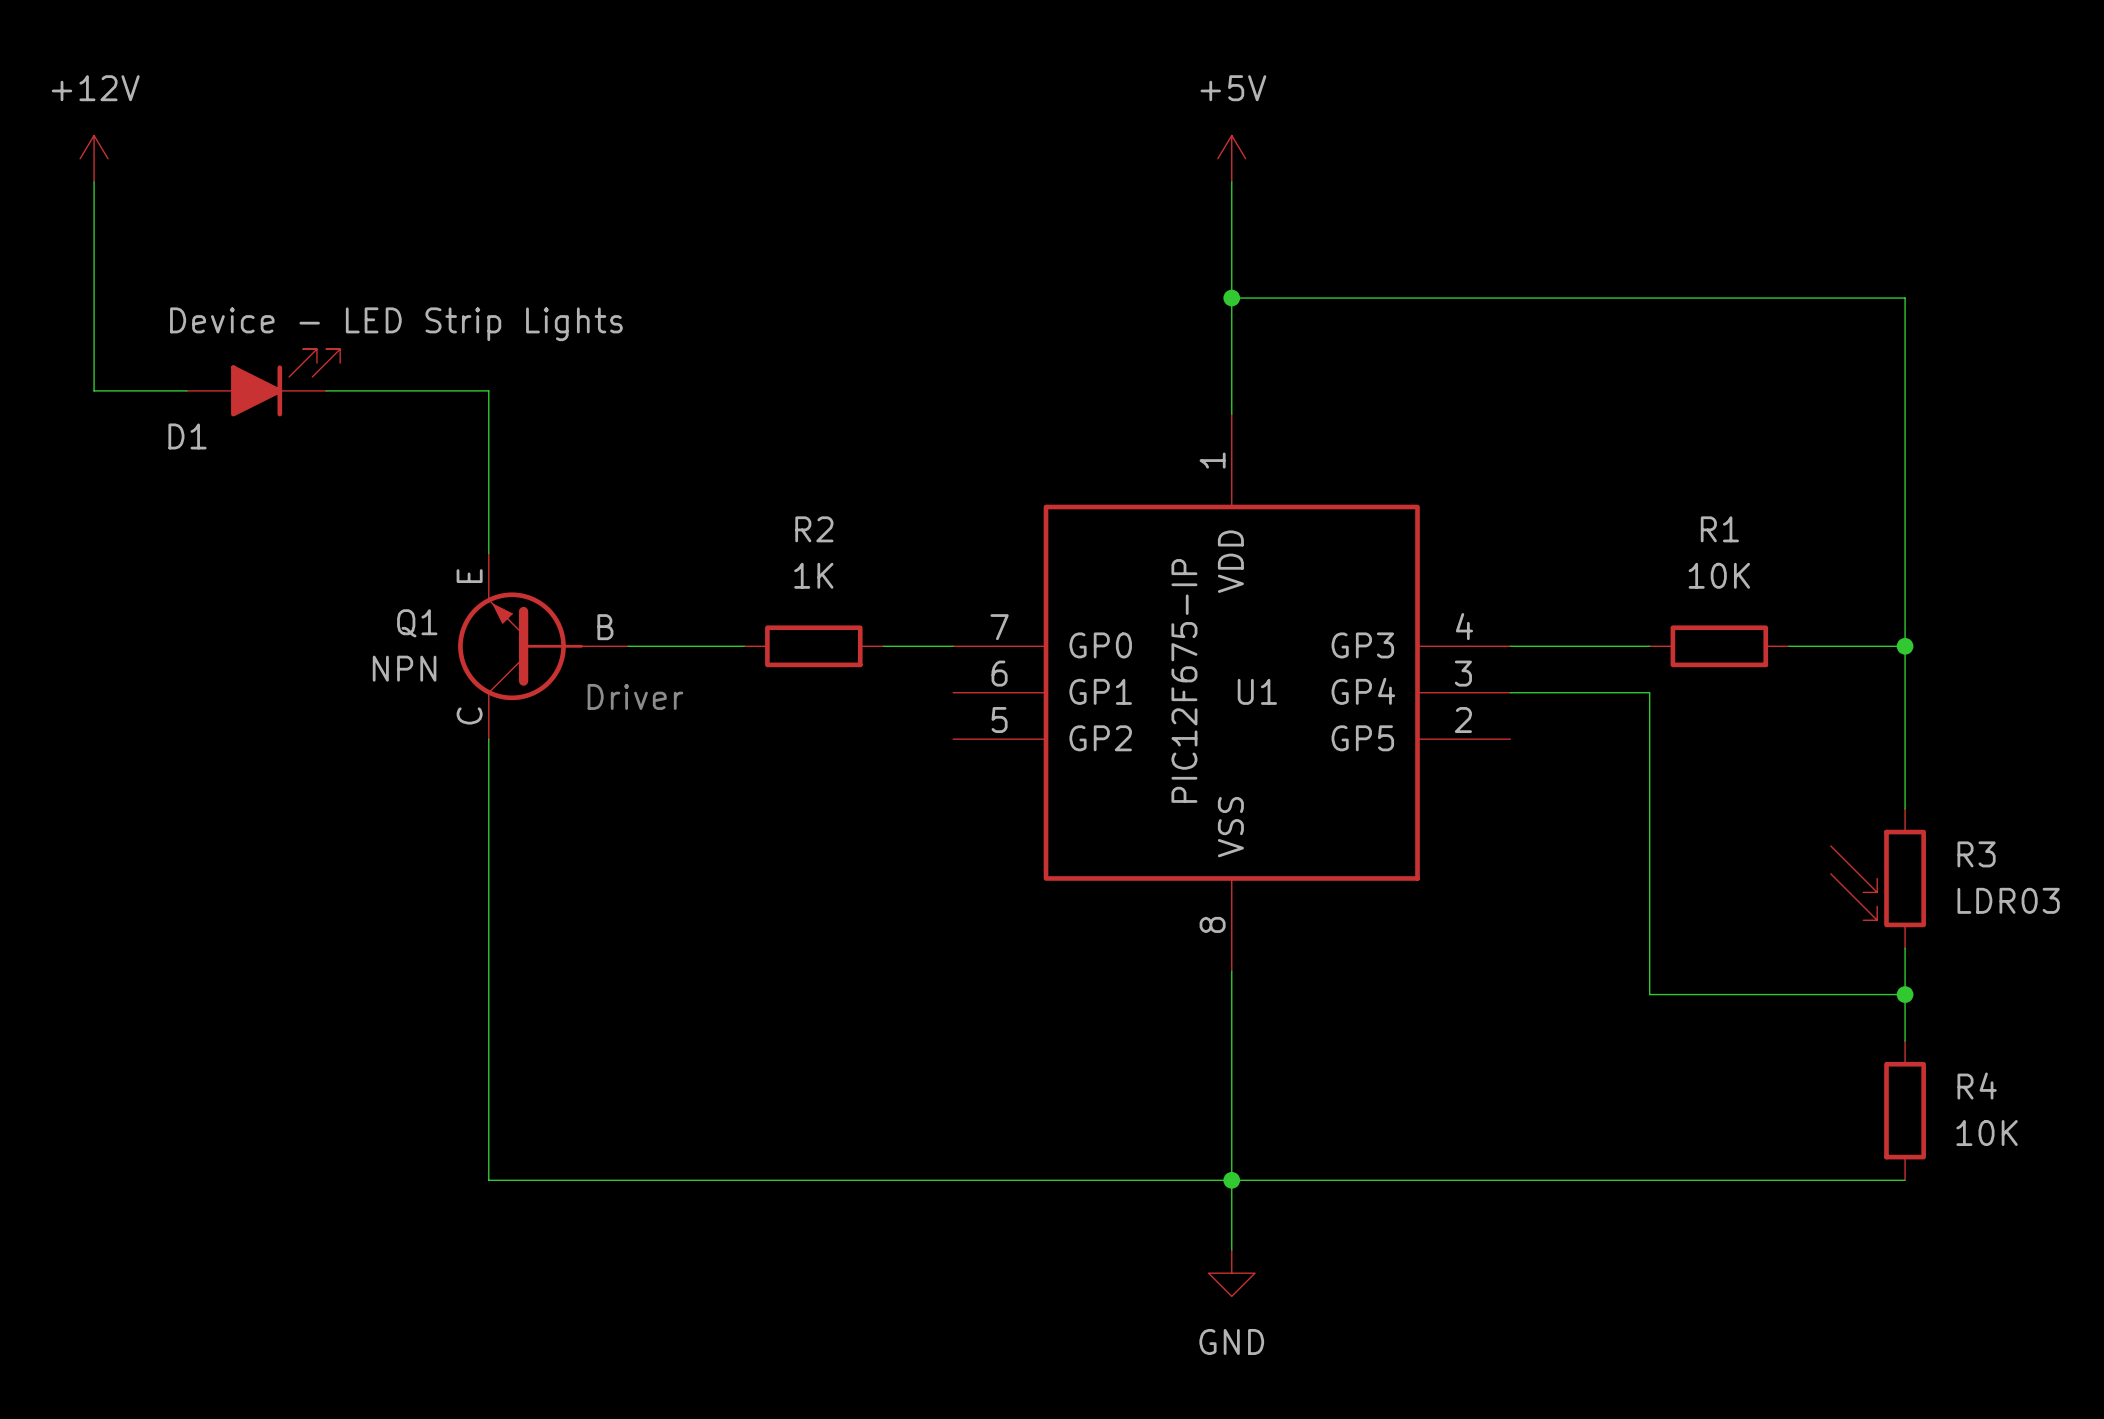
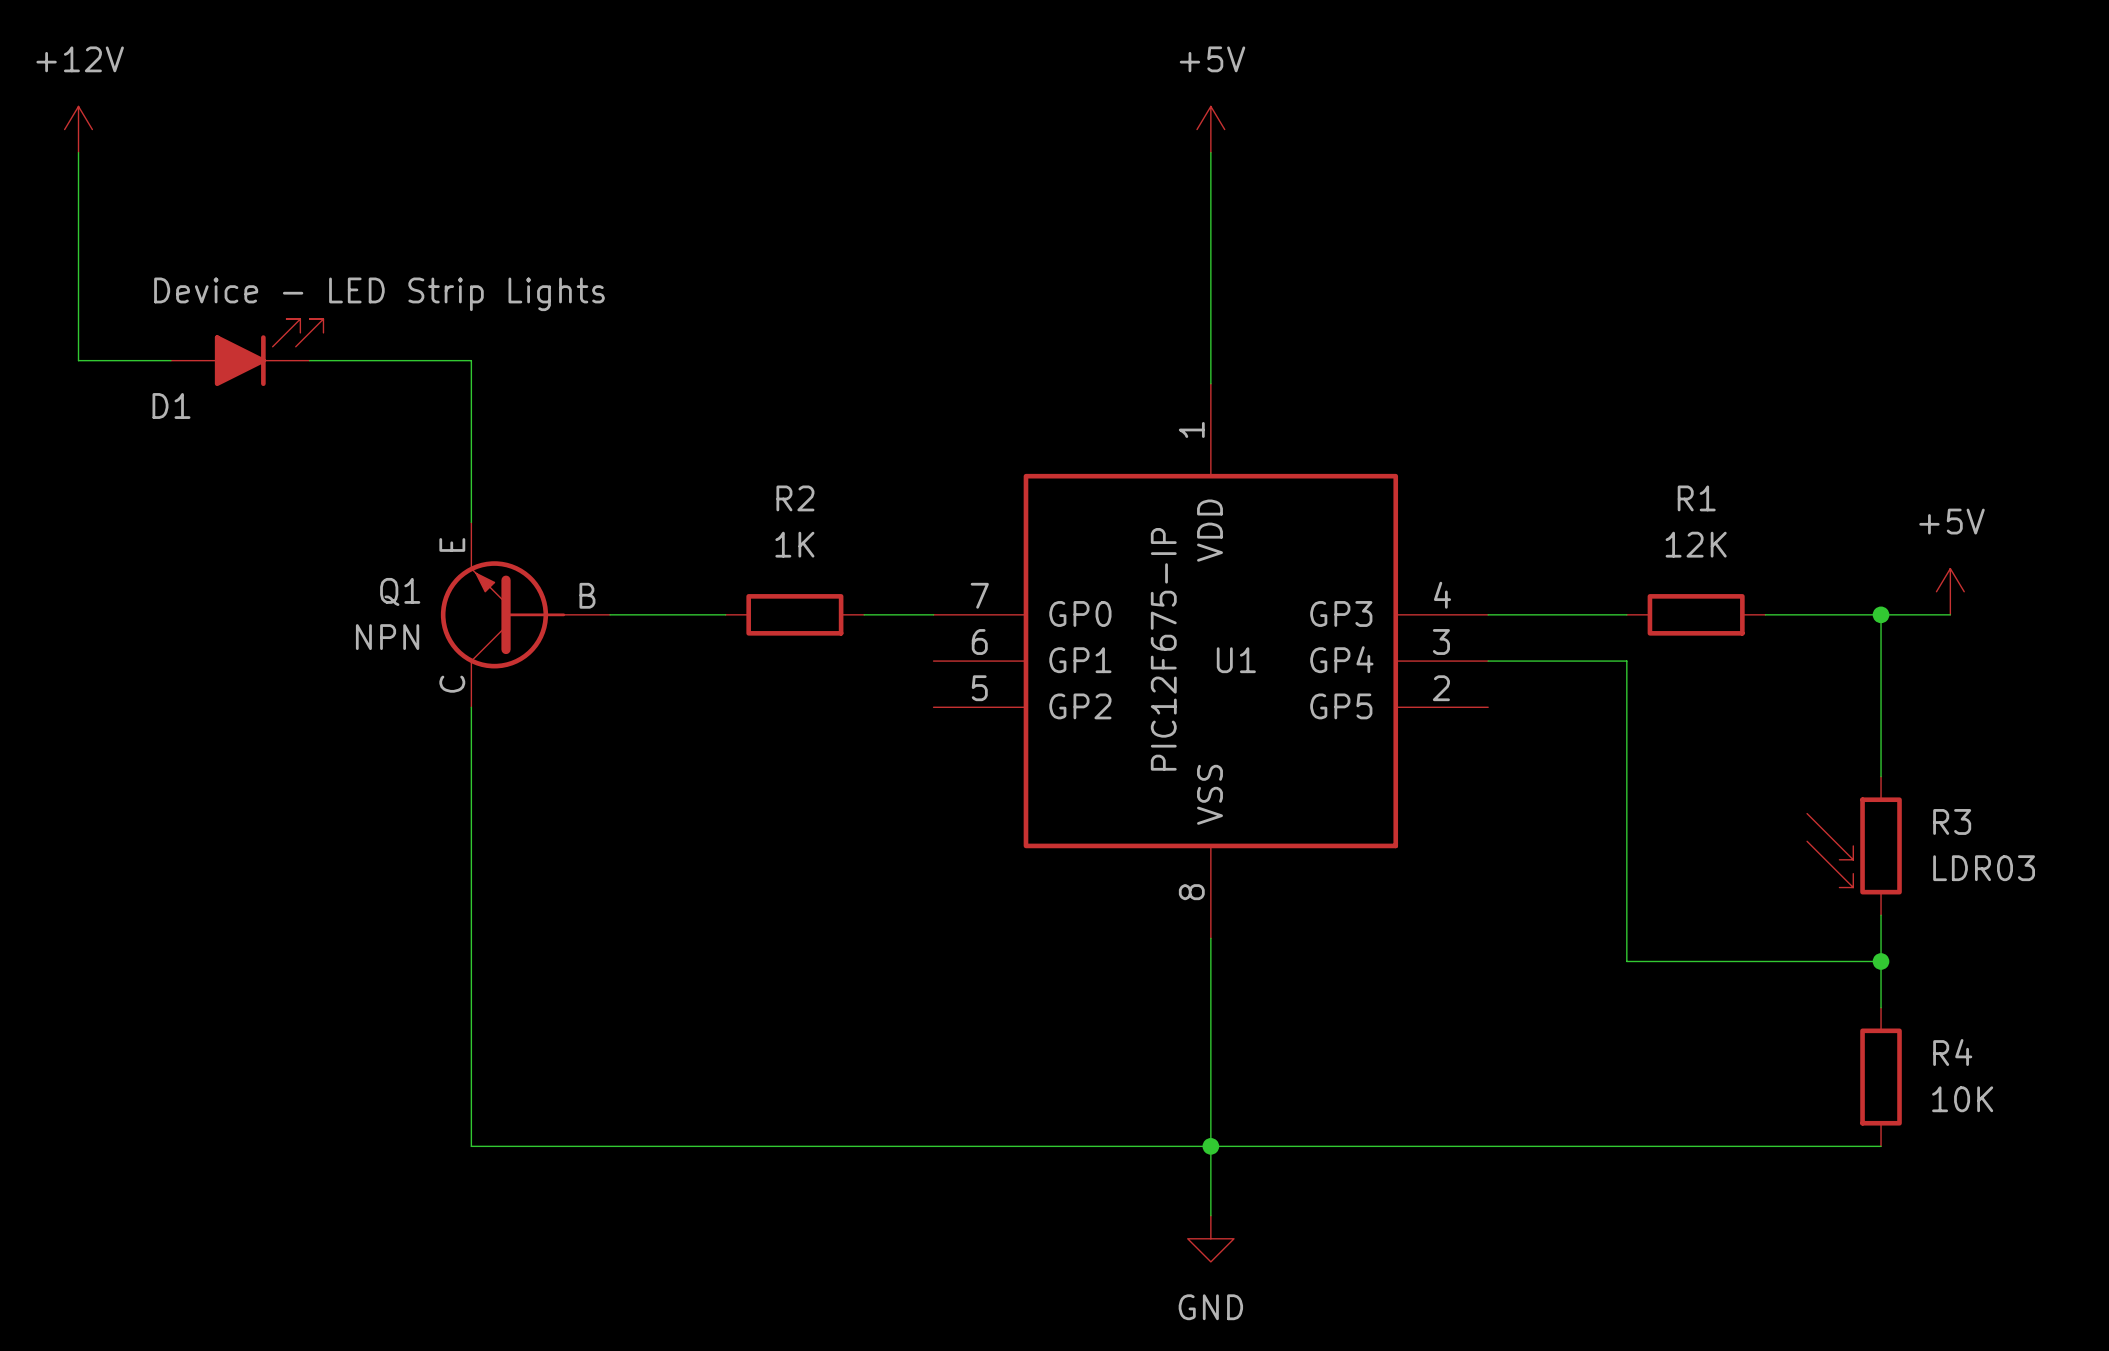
wire: (1231, 298) (1905, 298) (1905, 646) -> (1950, 614) (1881, 614)
junction: (1231, 298) -> none
R1 value: 10K (1719, 575) -> 12K (1696, 544)
power symbol: none -> +5V (1950, 591)
text: Driver (635, 696) -> none

